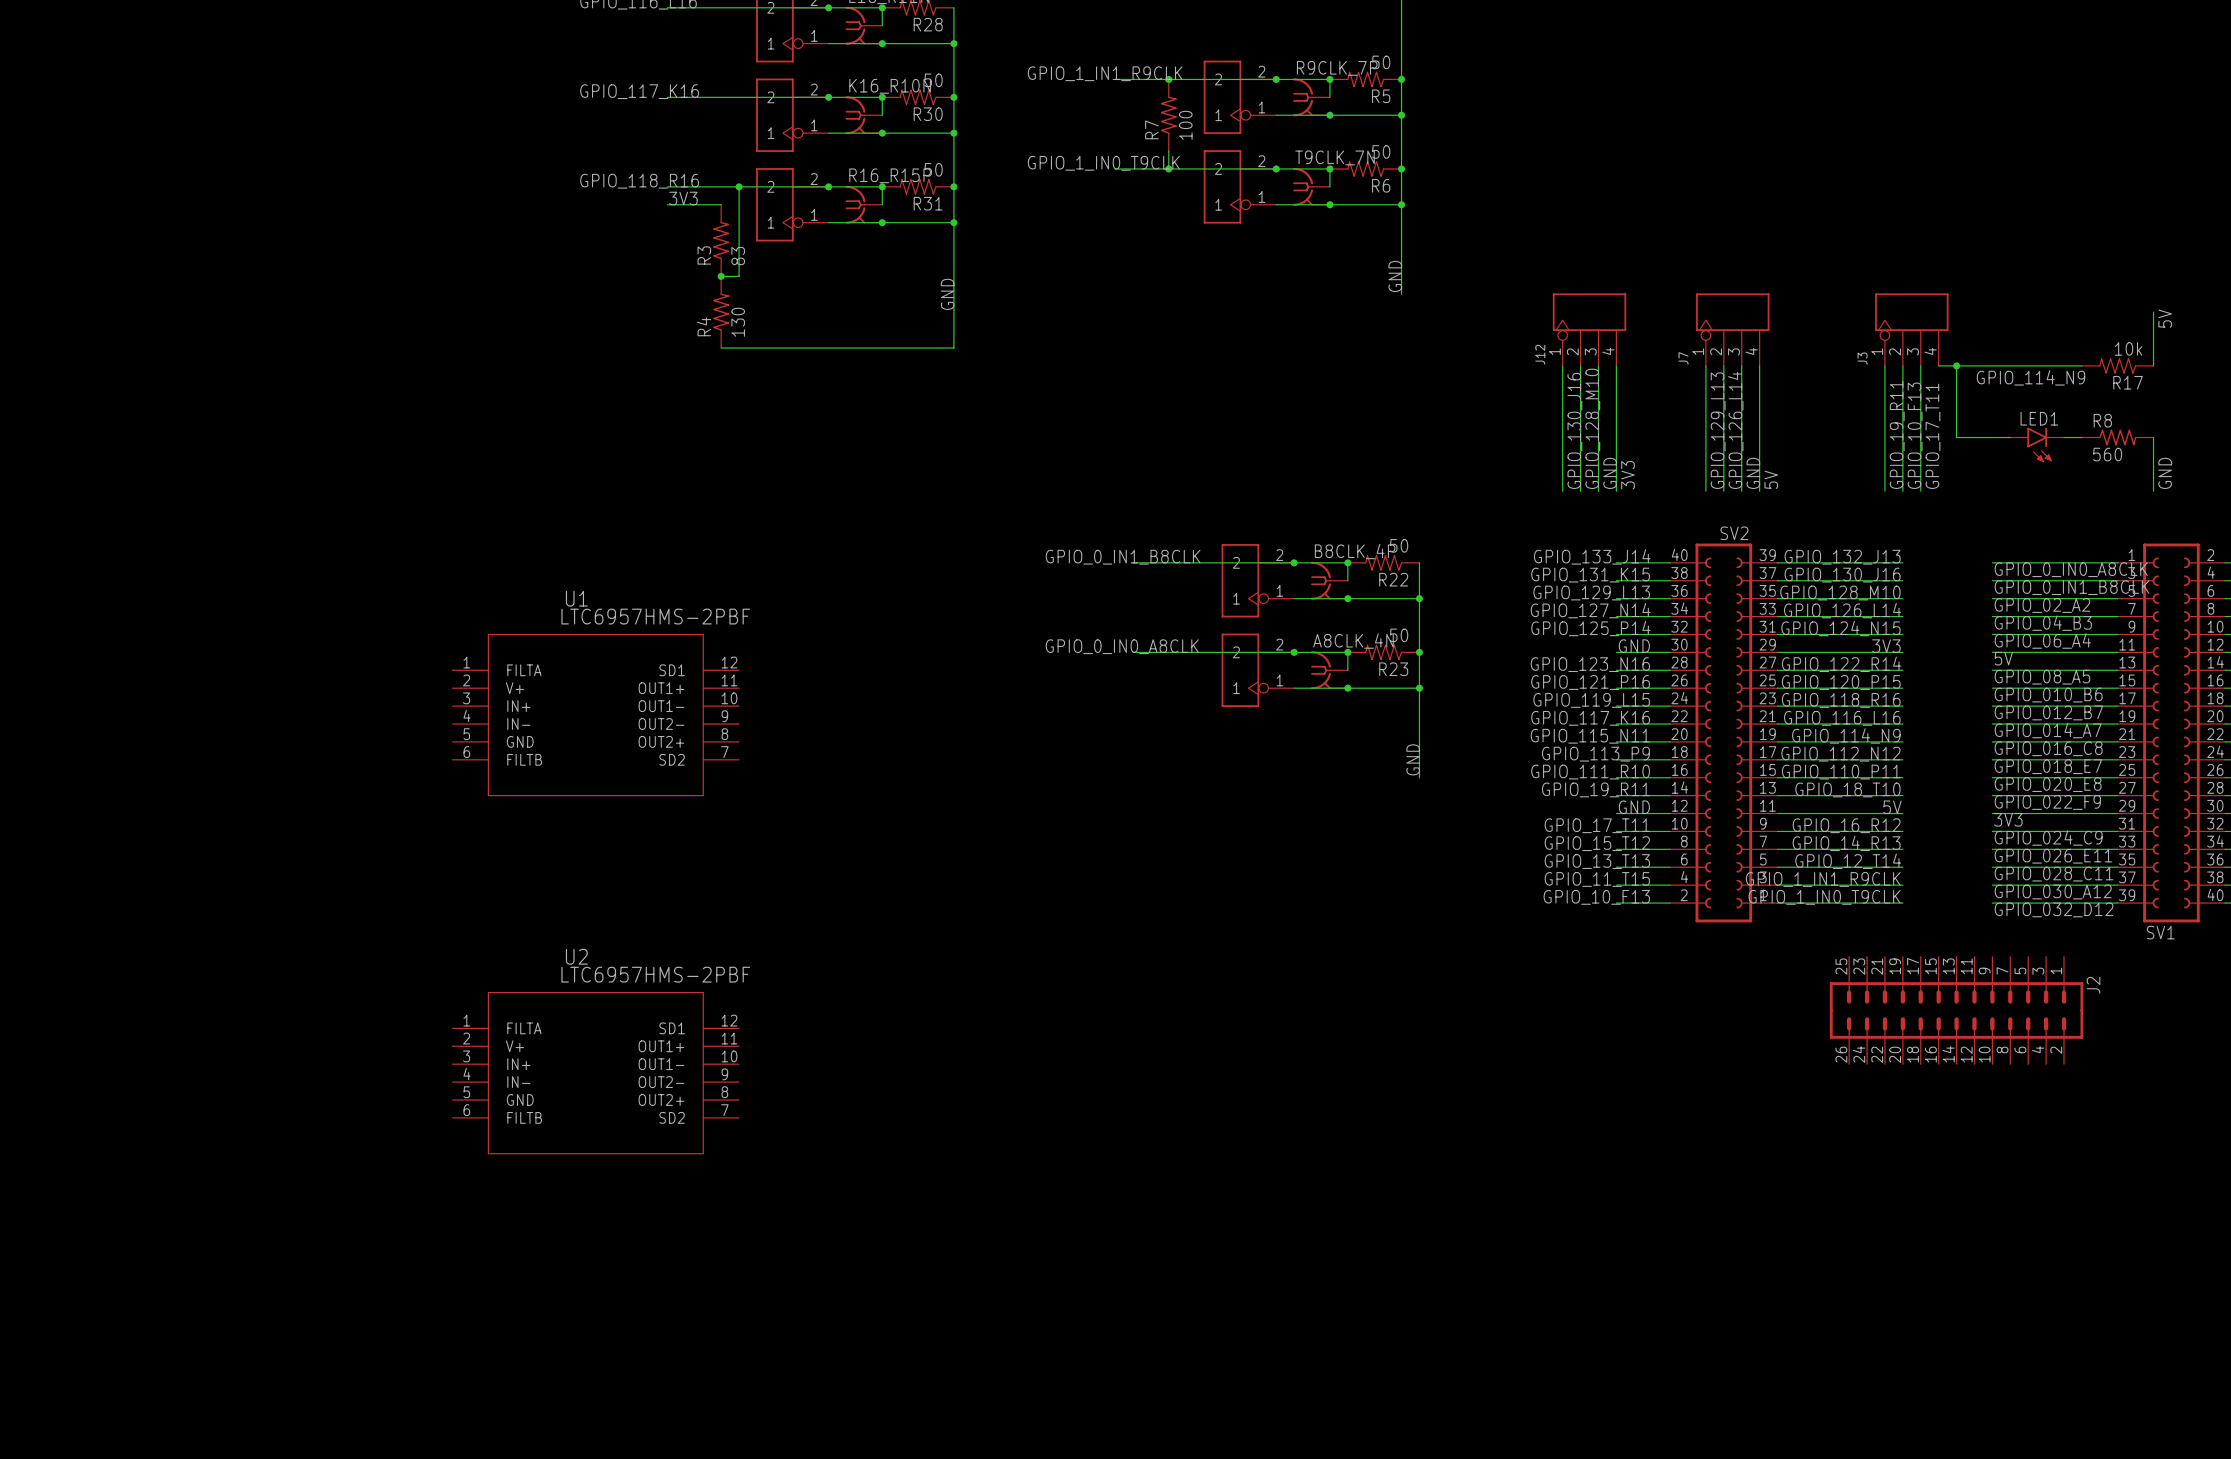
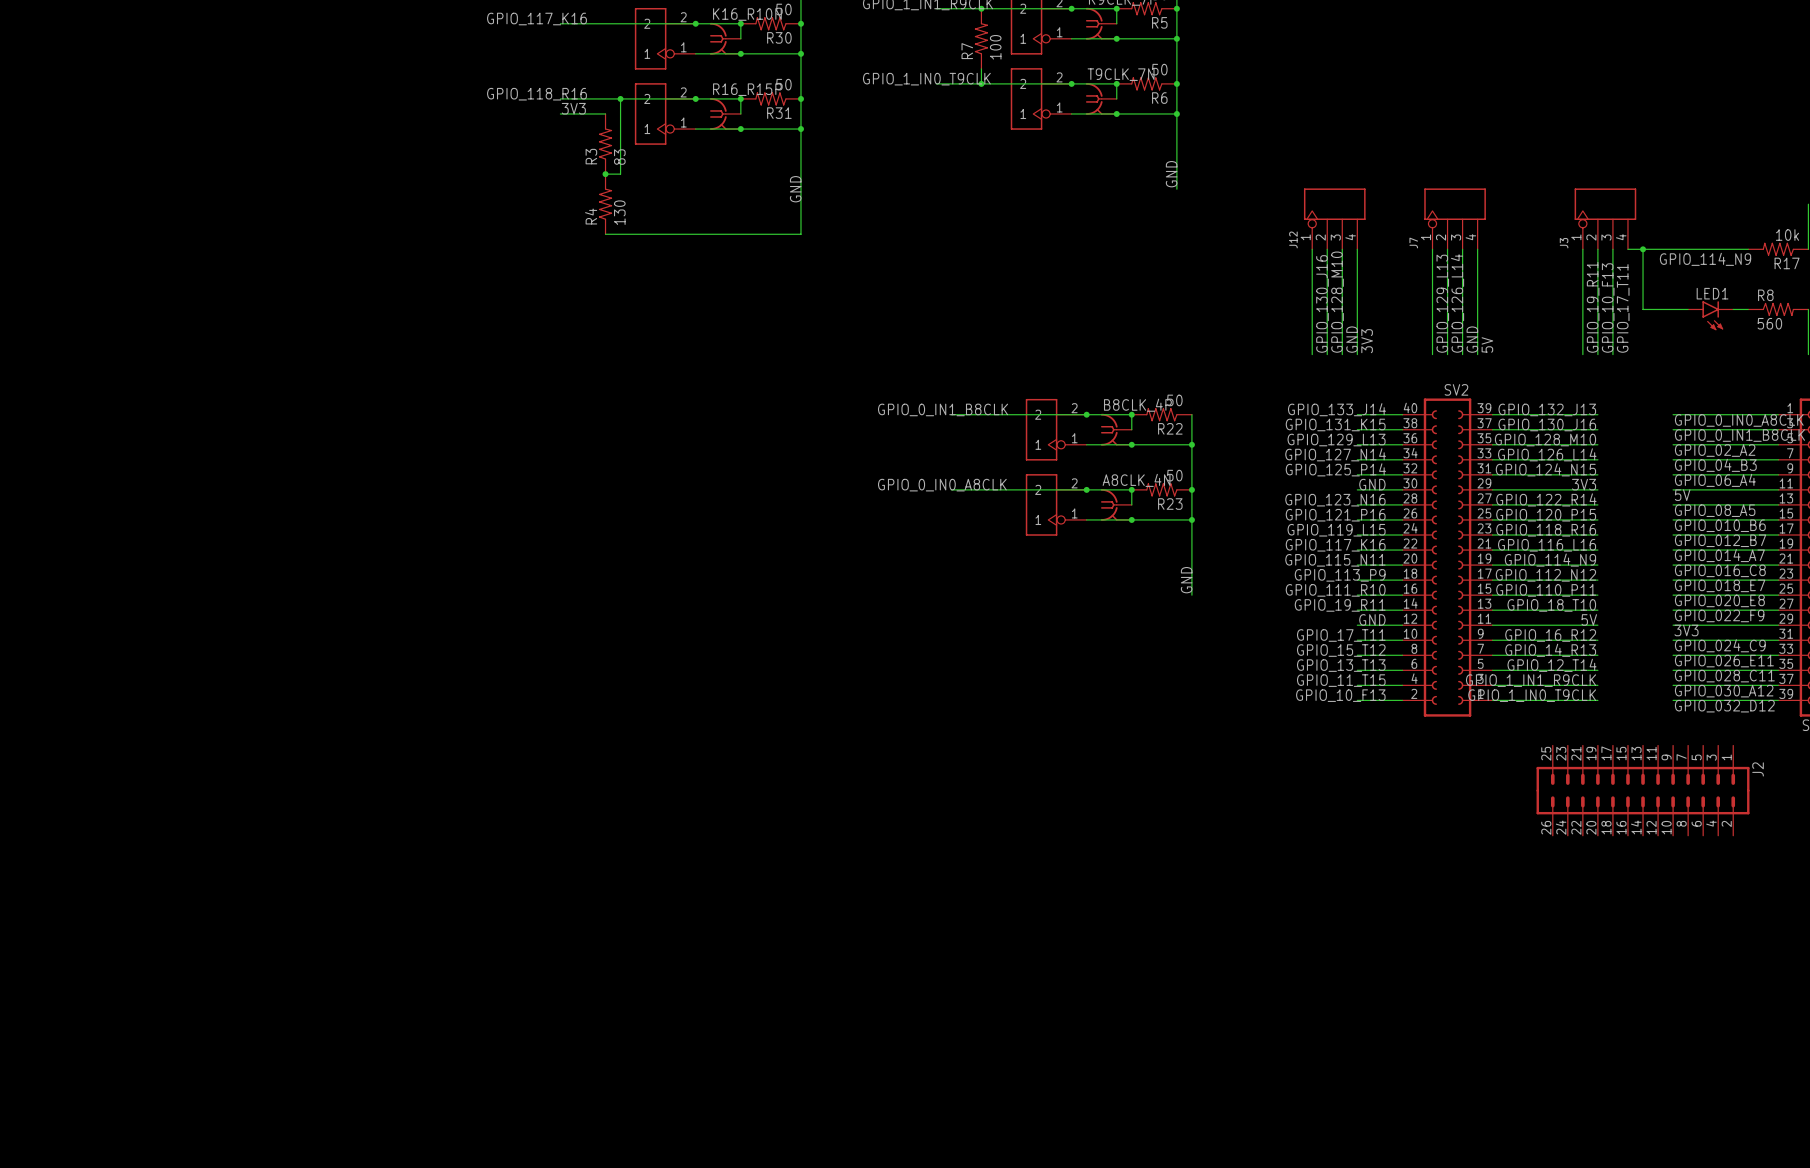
U1: LTC6957HMS-2PBF (595, 715) -> none
U2: LTC6957HMS-2PBF (595, 1073) -> none

